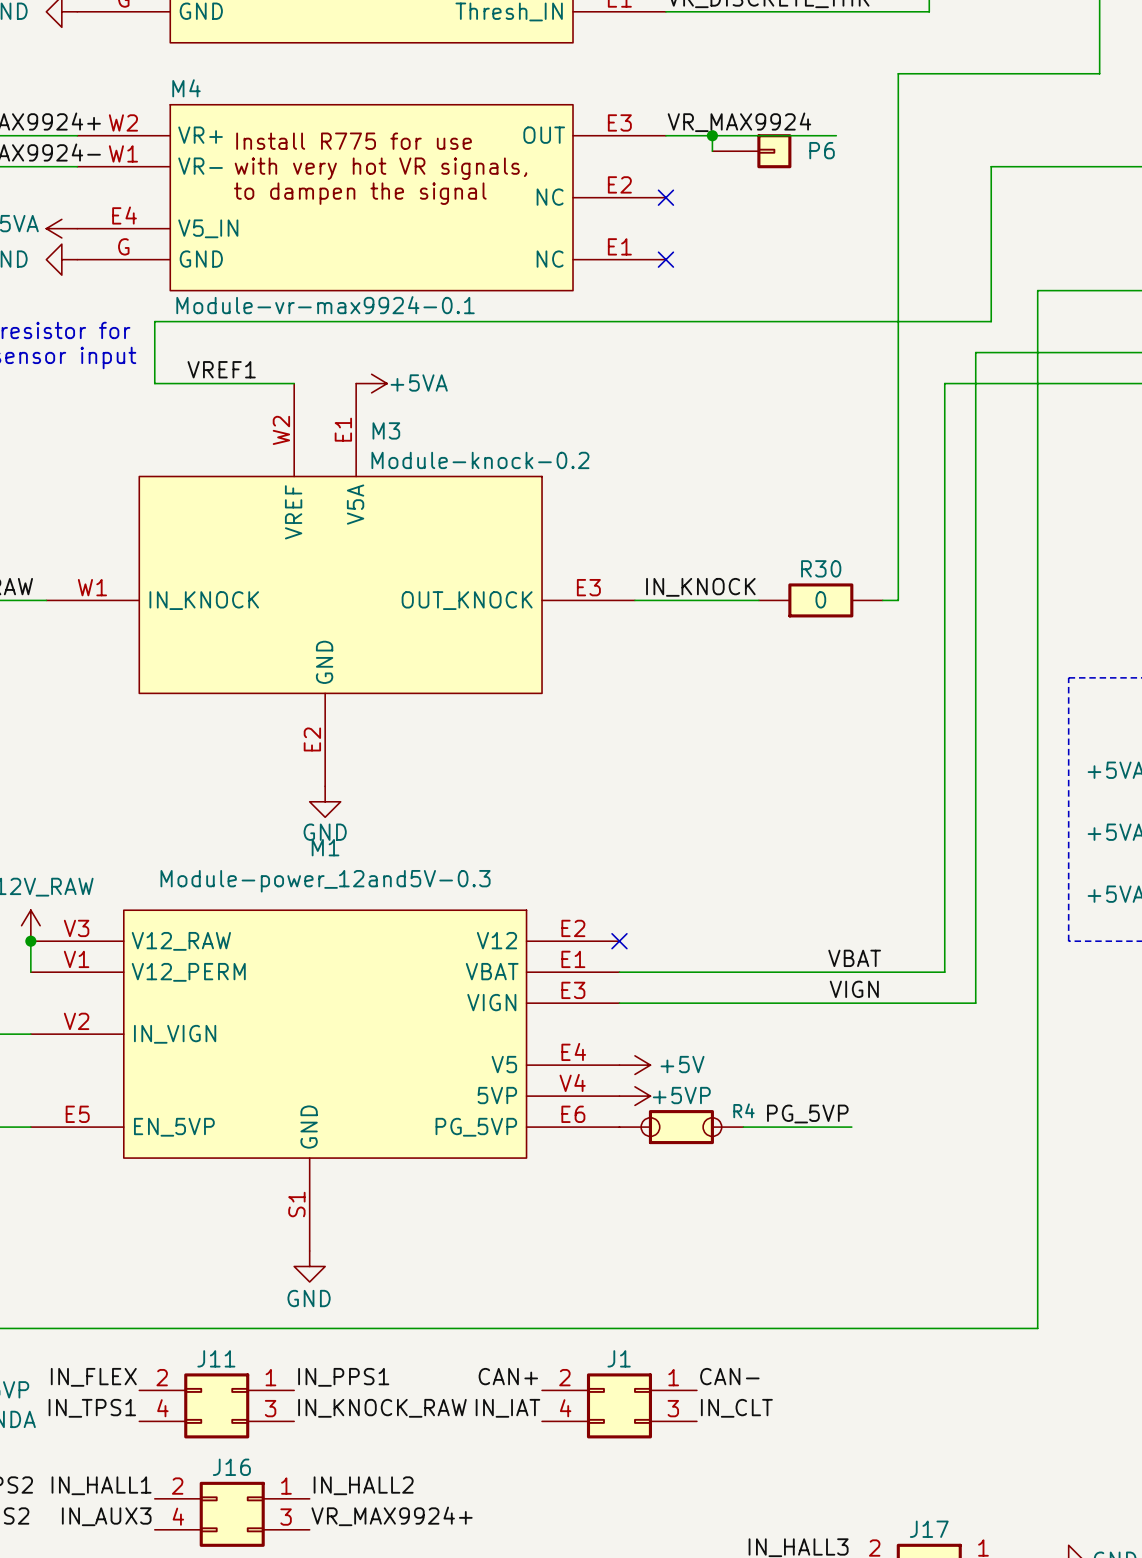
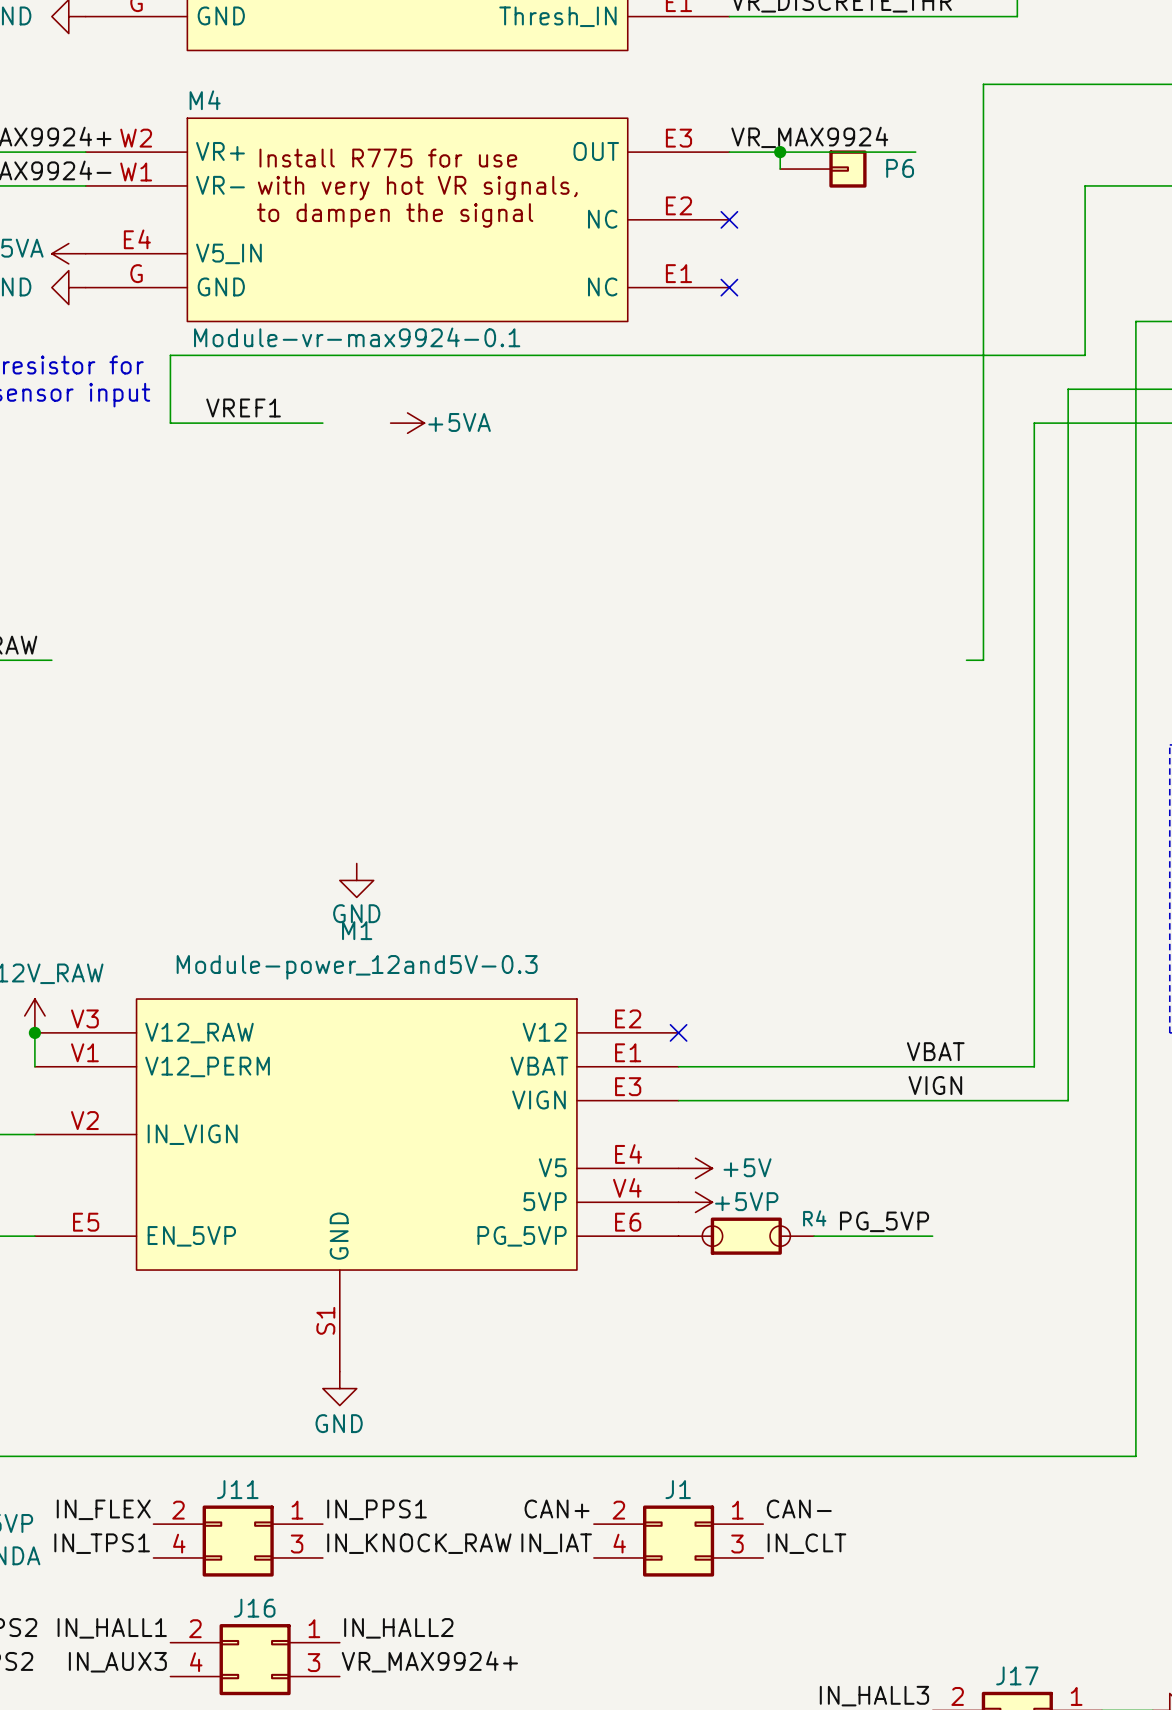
M3: Module-knock-0.2 (340, 584) -> none
label: IN_KNOCK (700, 587) -> none
wire: (634, 600) (758, 600) -> none
R30: 0 (820, 600) -> none

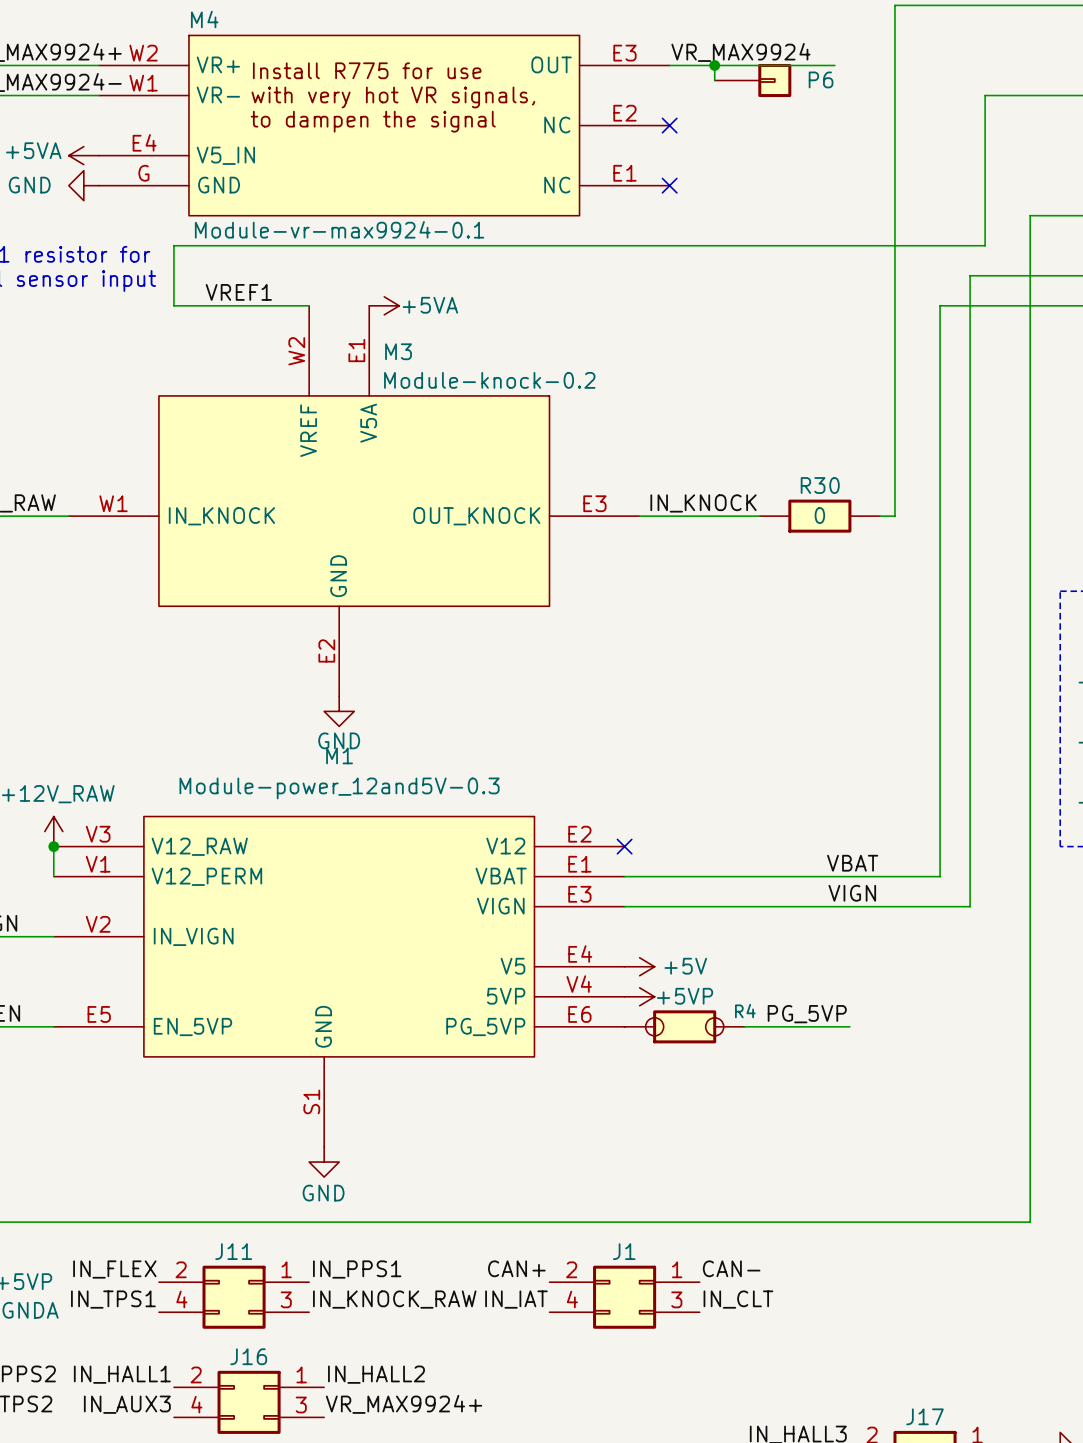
M3: none -> Module-knock-0.2 (354, 501)
label: none -> IN_KNOCK (703, 503)
wire: none -> (639, 516) (759, 516)
R30: none -> 0 (819, 516)

